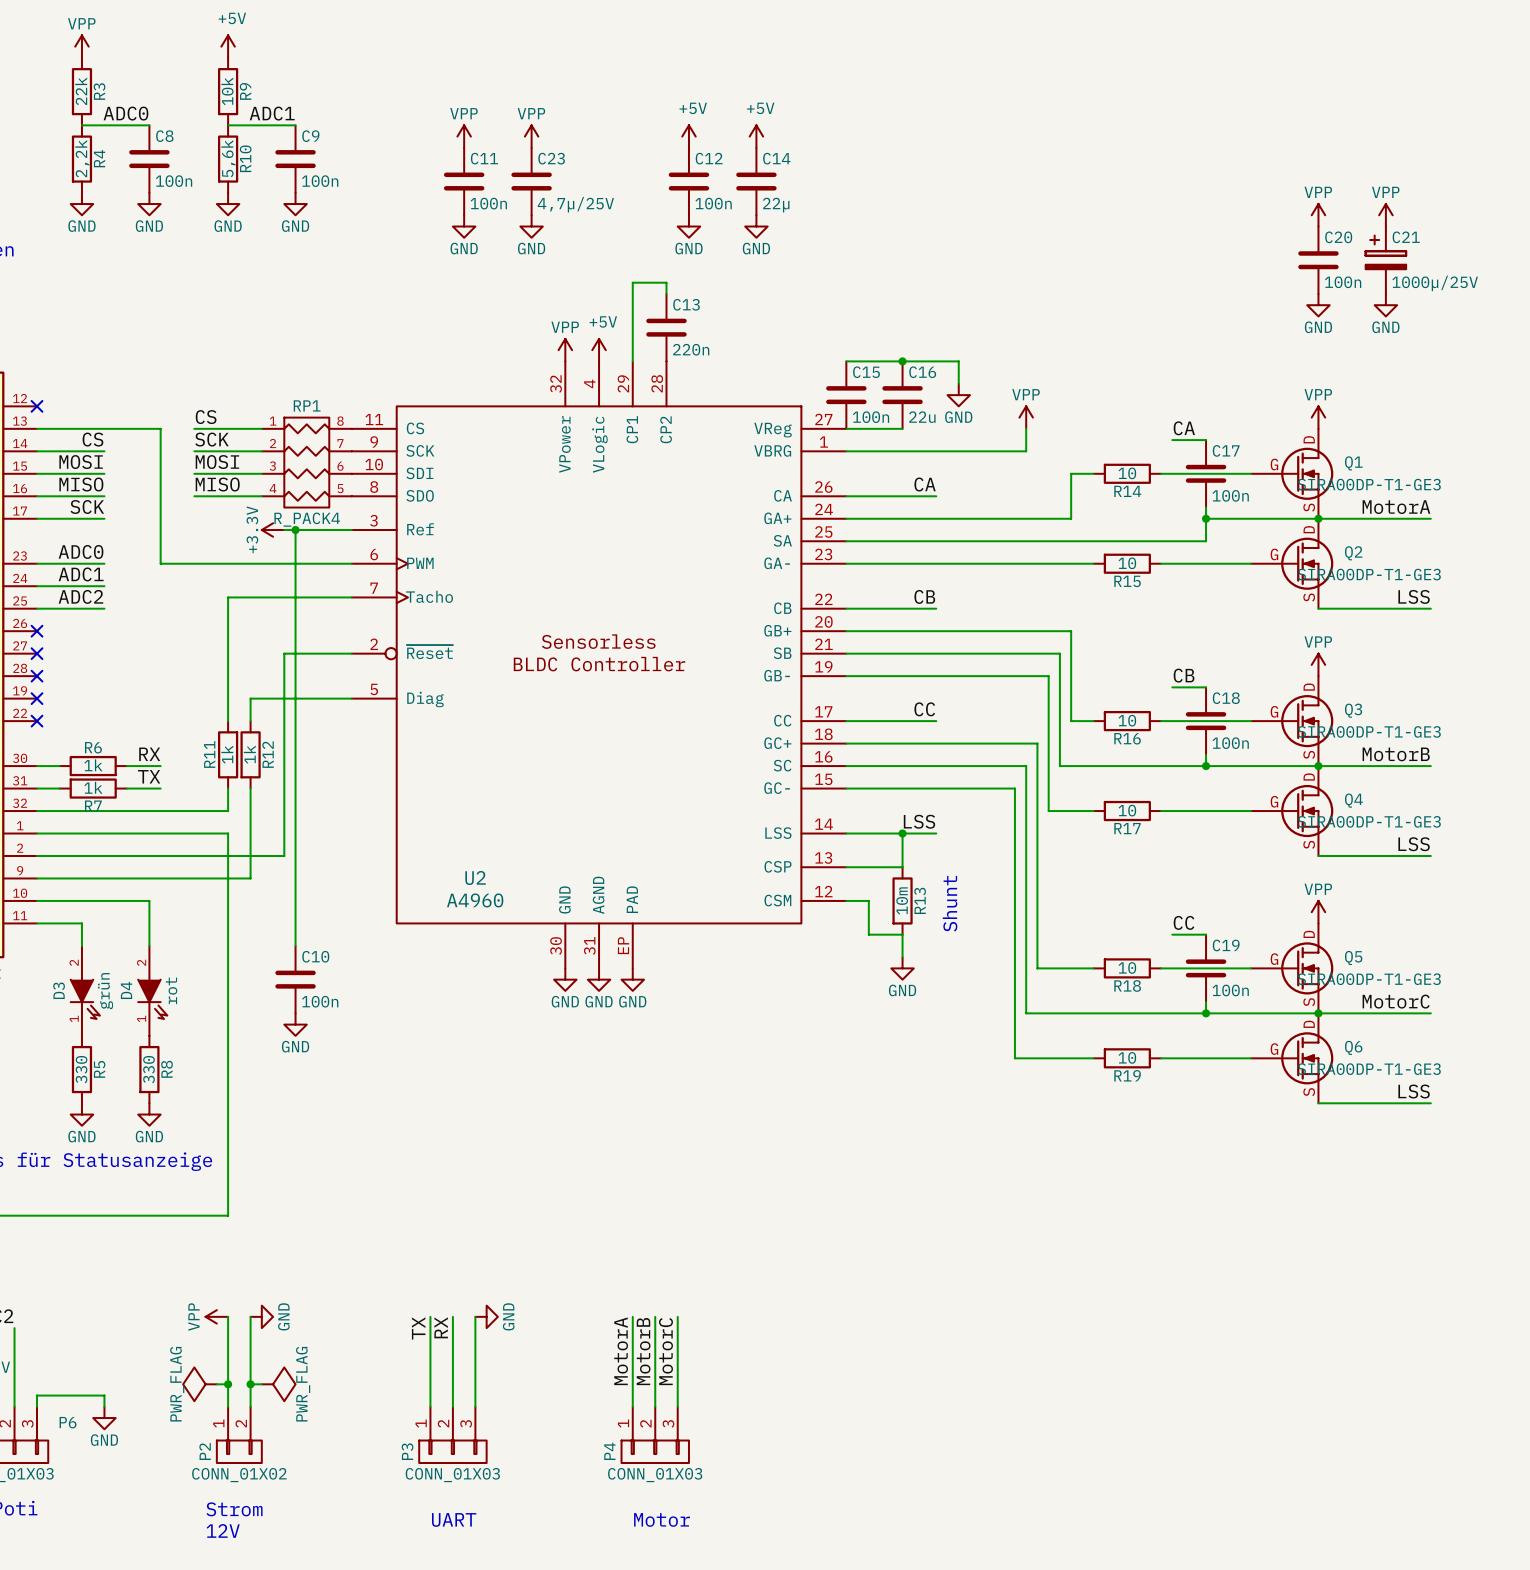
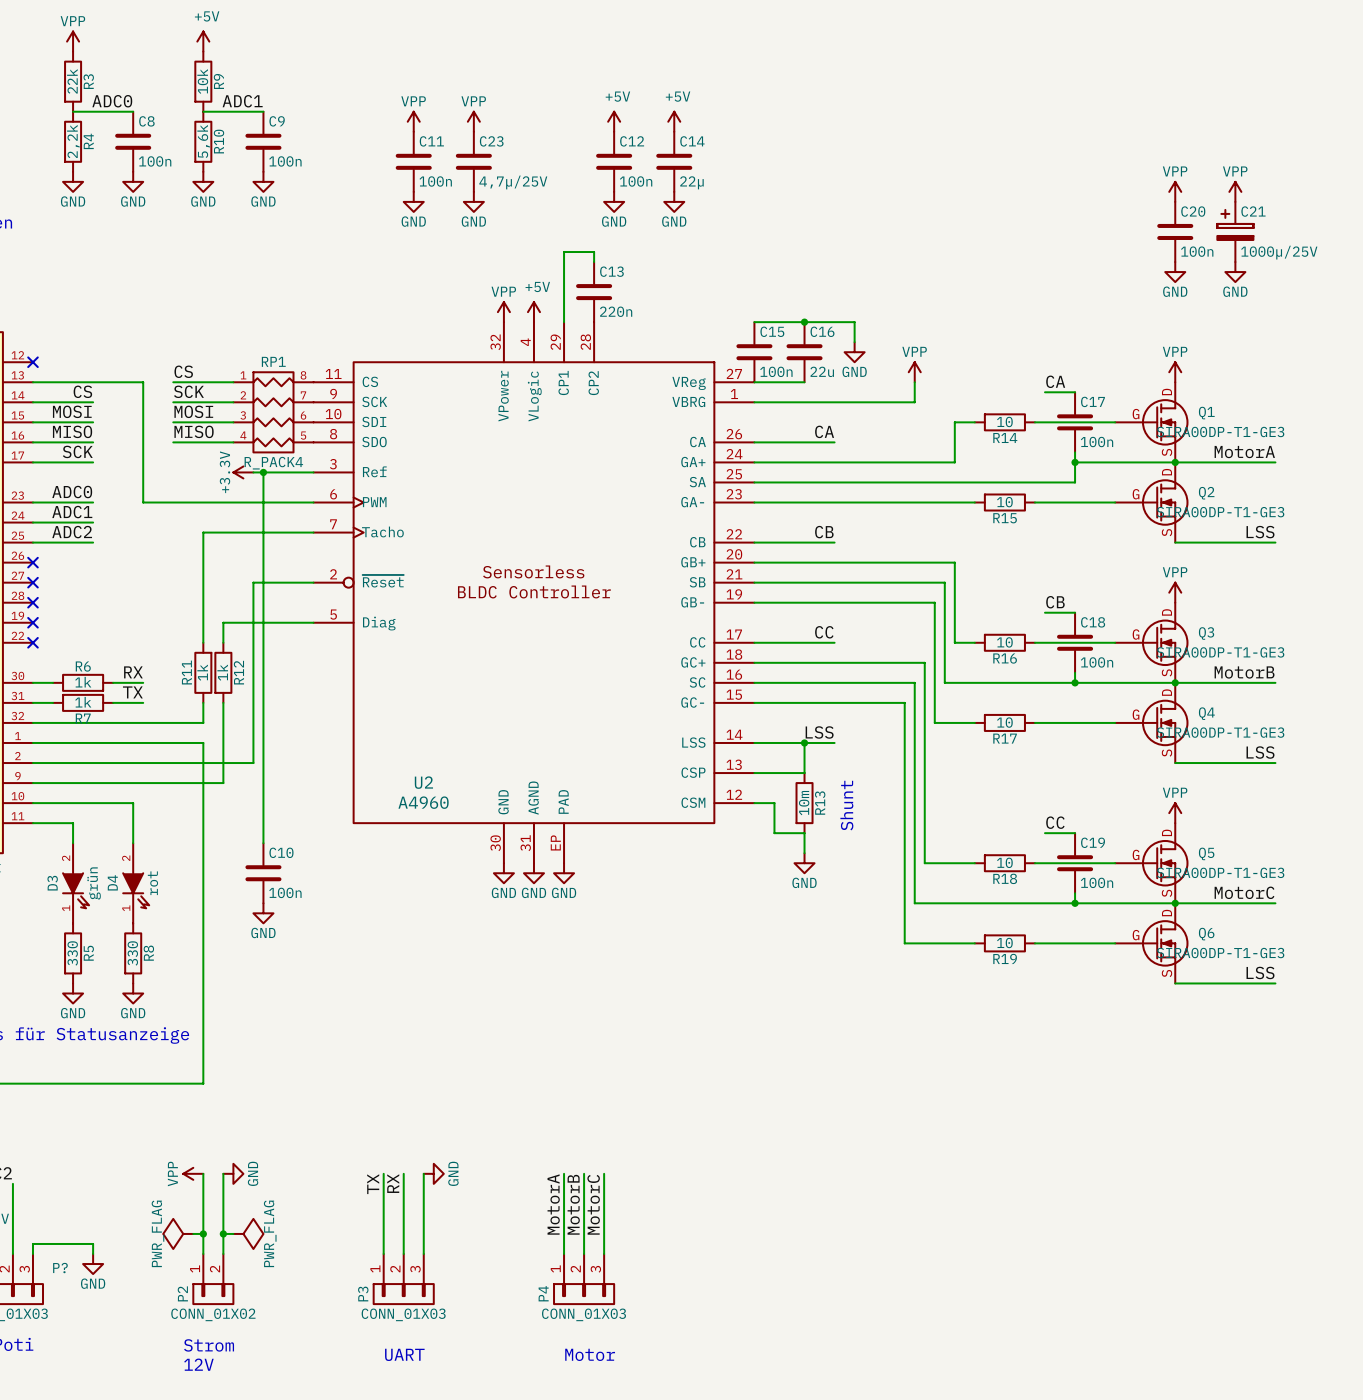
P6 name: P6 (68, 1422) -> P? (60, 1268)

